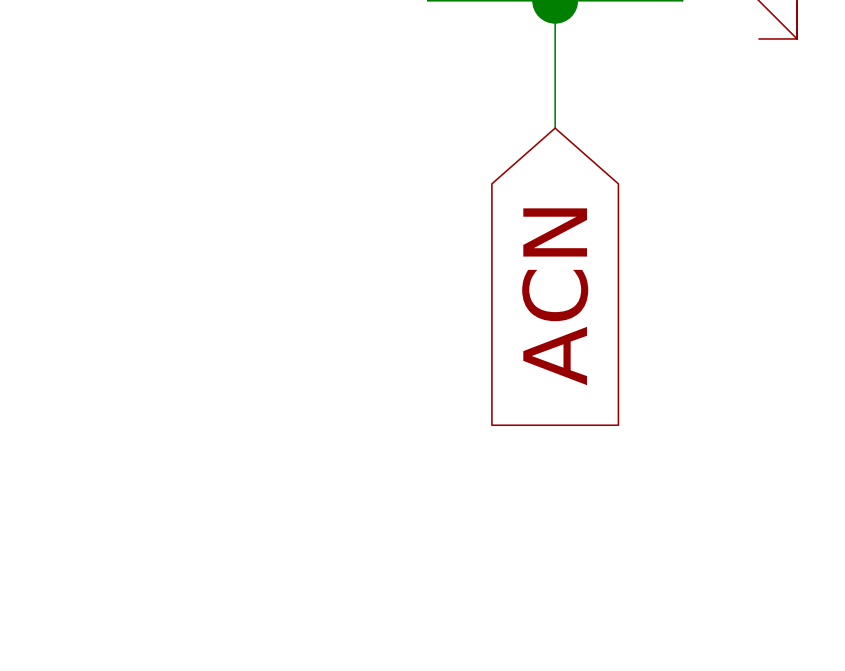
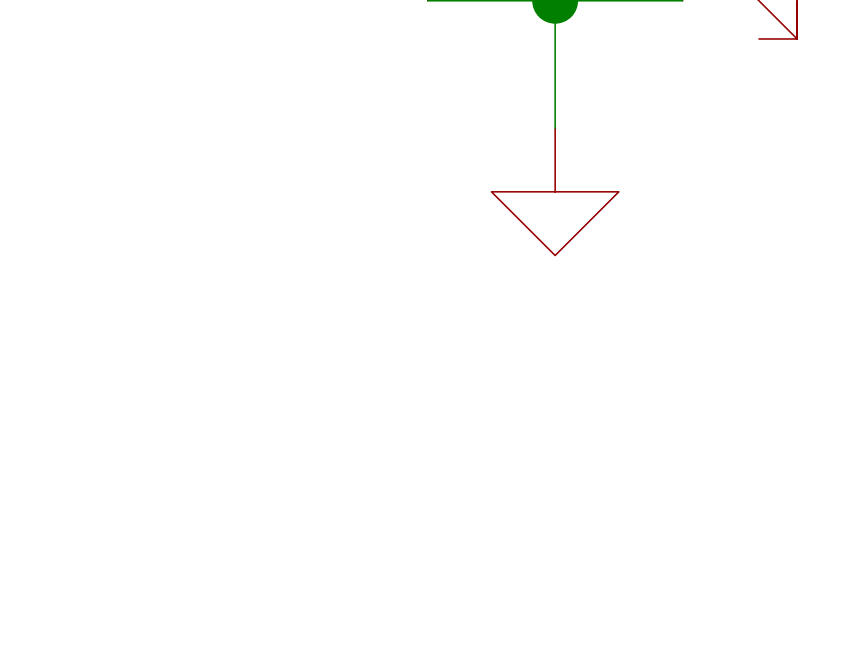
power symbol: none -> (555, 191)
global label: ACN (555, 296) -> none

